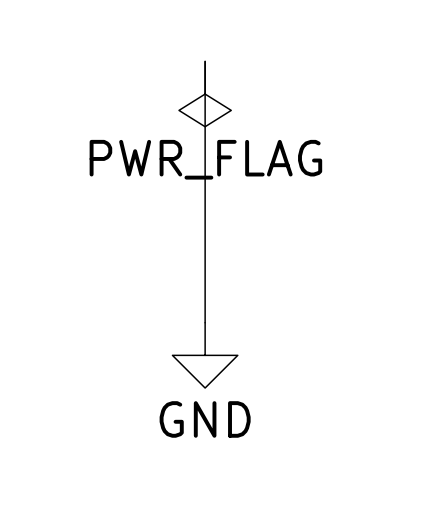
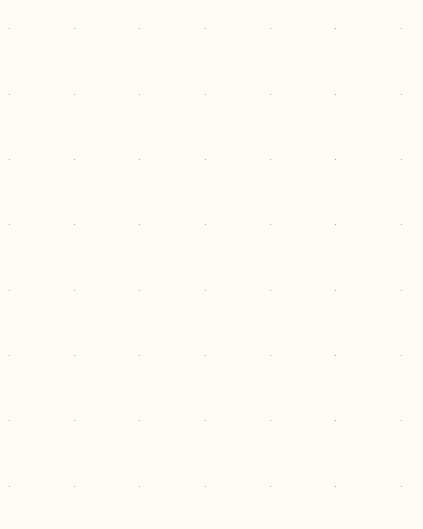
wire: (205, 61) (205, 322) -> none
power symbol: PWR_FLAG (205, 94) -> none
power symbol: GND (205, 355) -> none

